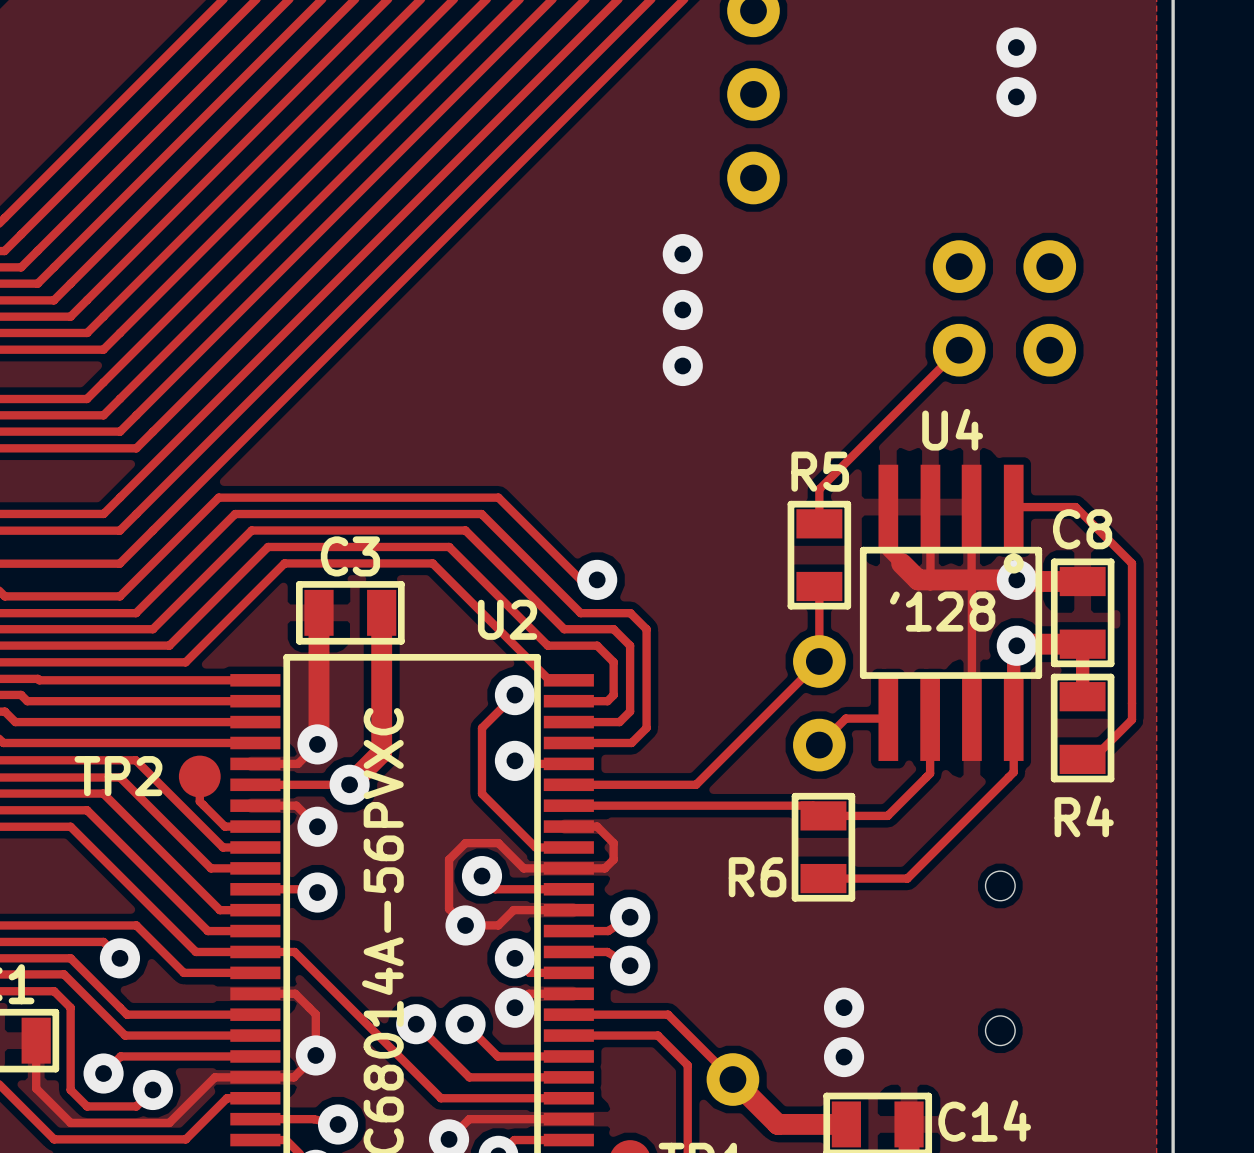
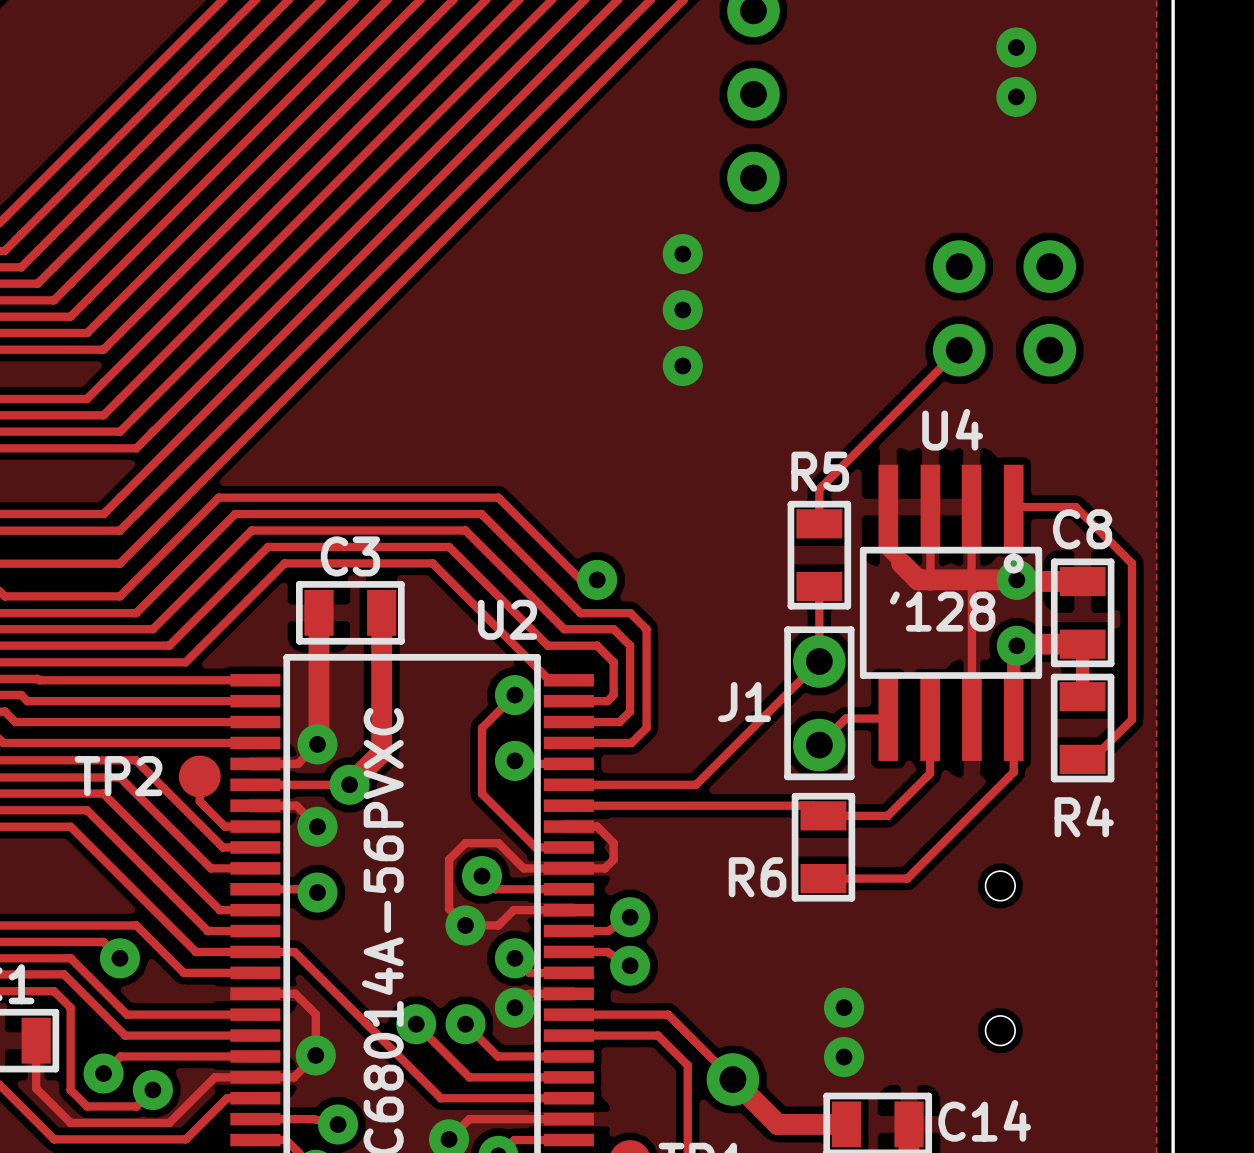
J1 side: bottom (819, 703) -> top (819, 703)

